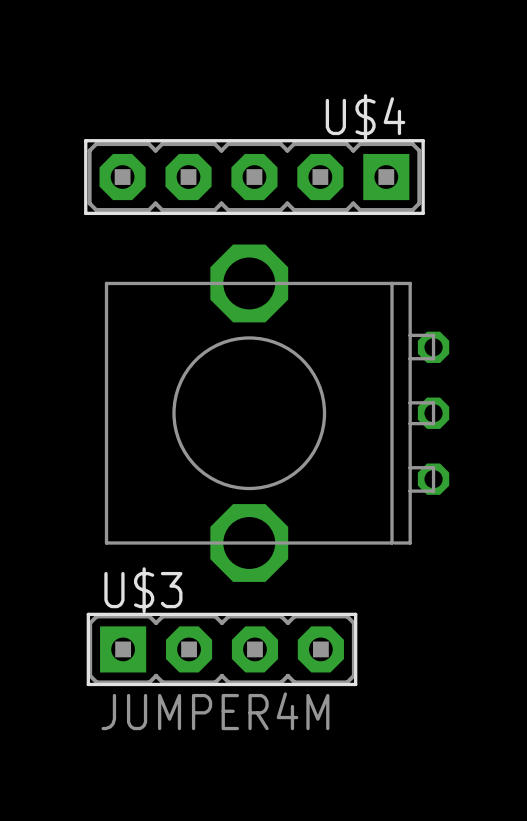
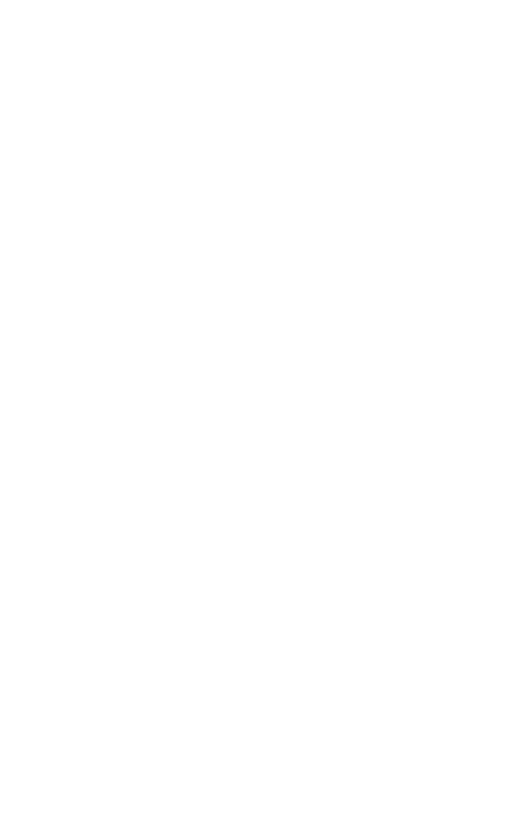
U$4: (254, 177) -> none
part: (277, 413) -> none
U$3: JUMPER4M (222, 649) -> none

